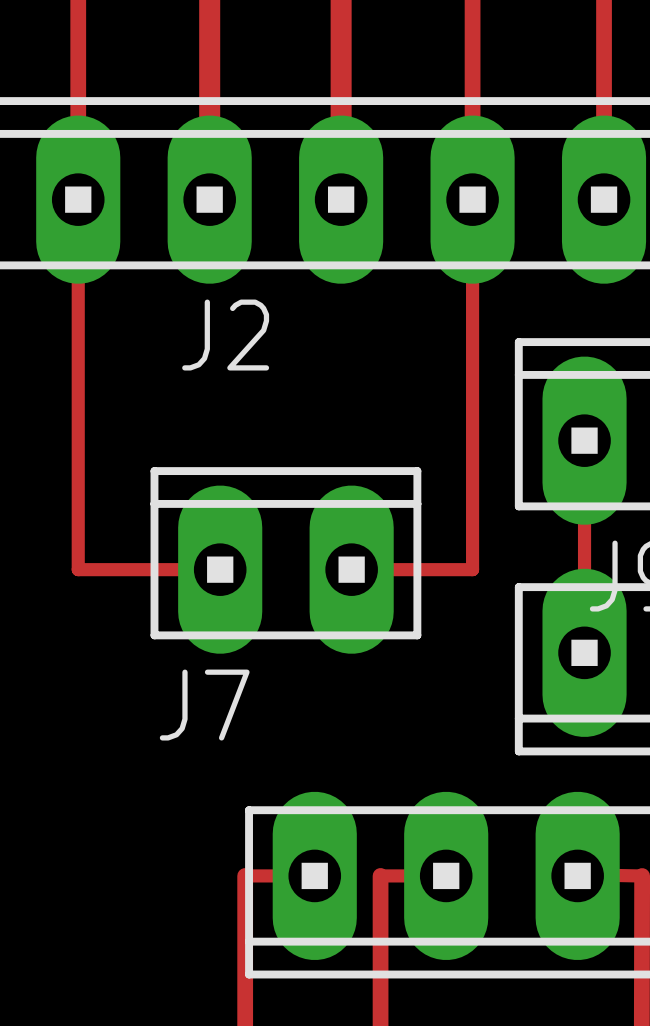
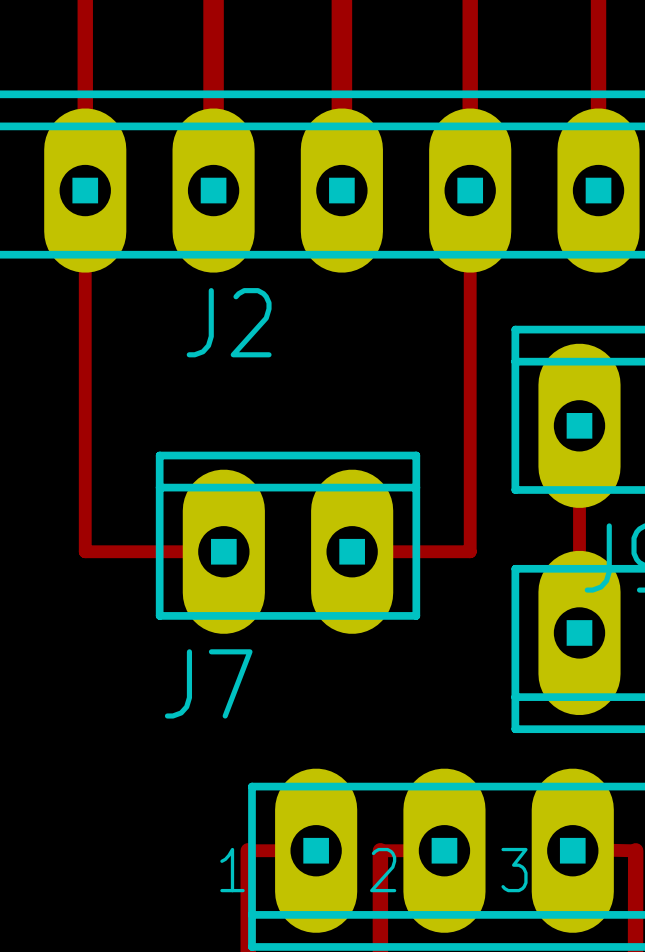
text: none -> 1 (232, 870)
text: none -> 2 (383, 870)
text: none -> 3 (514, 870)

